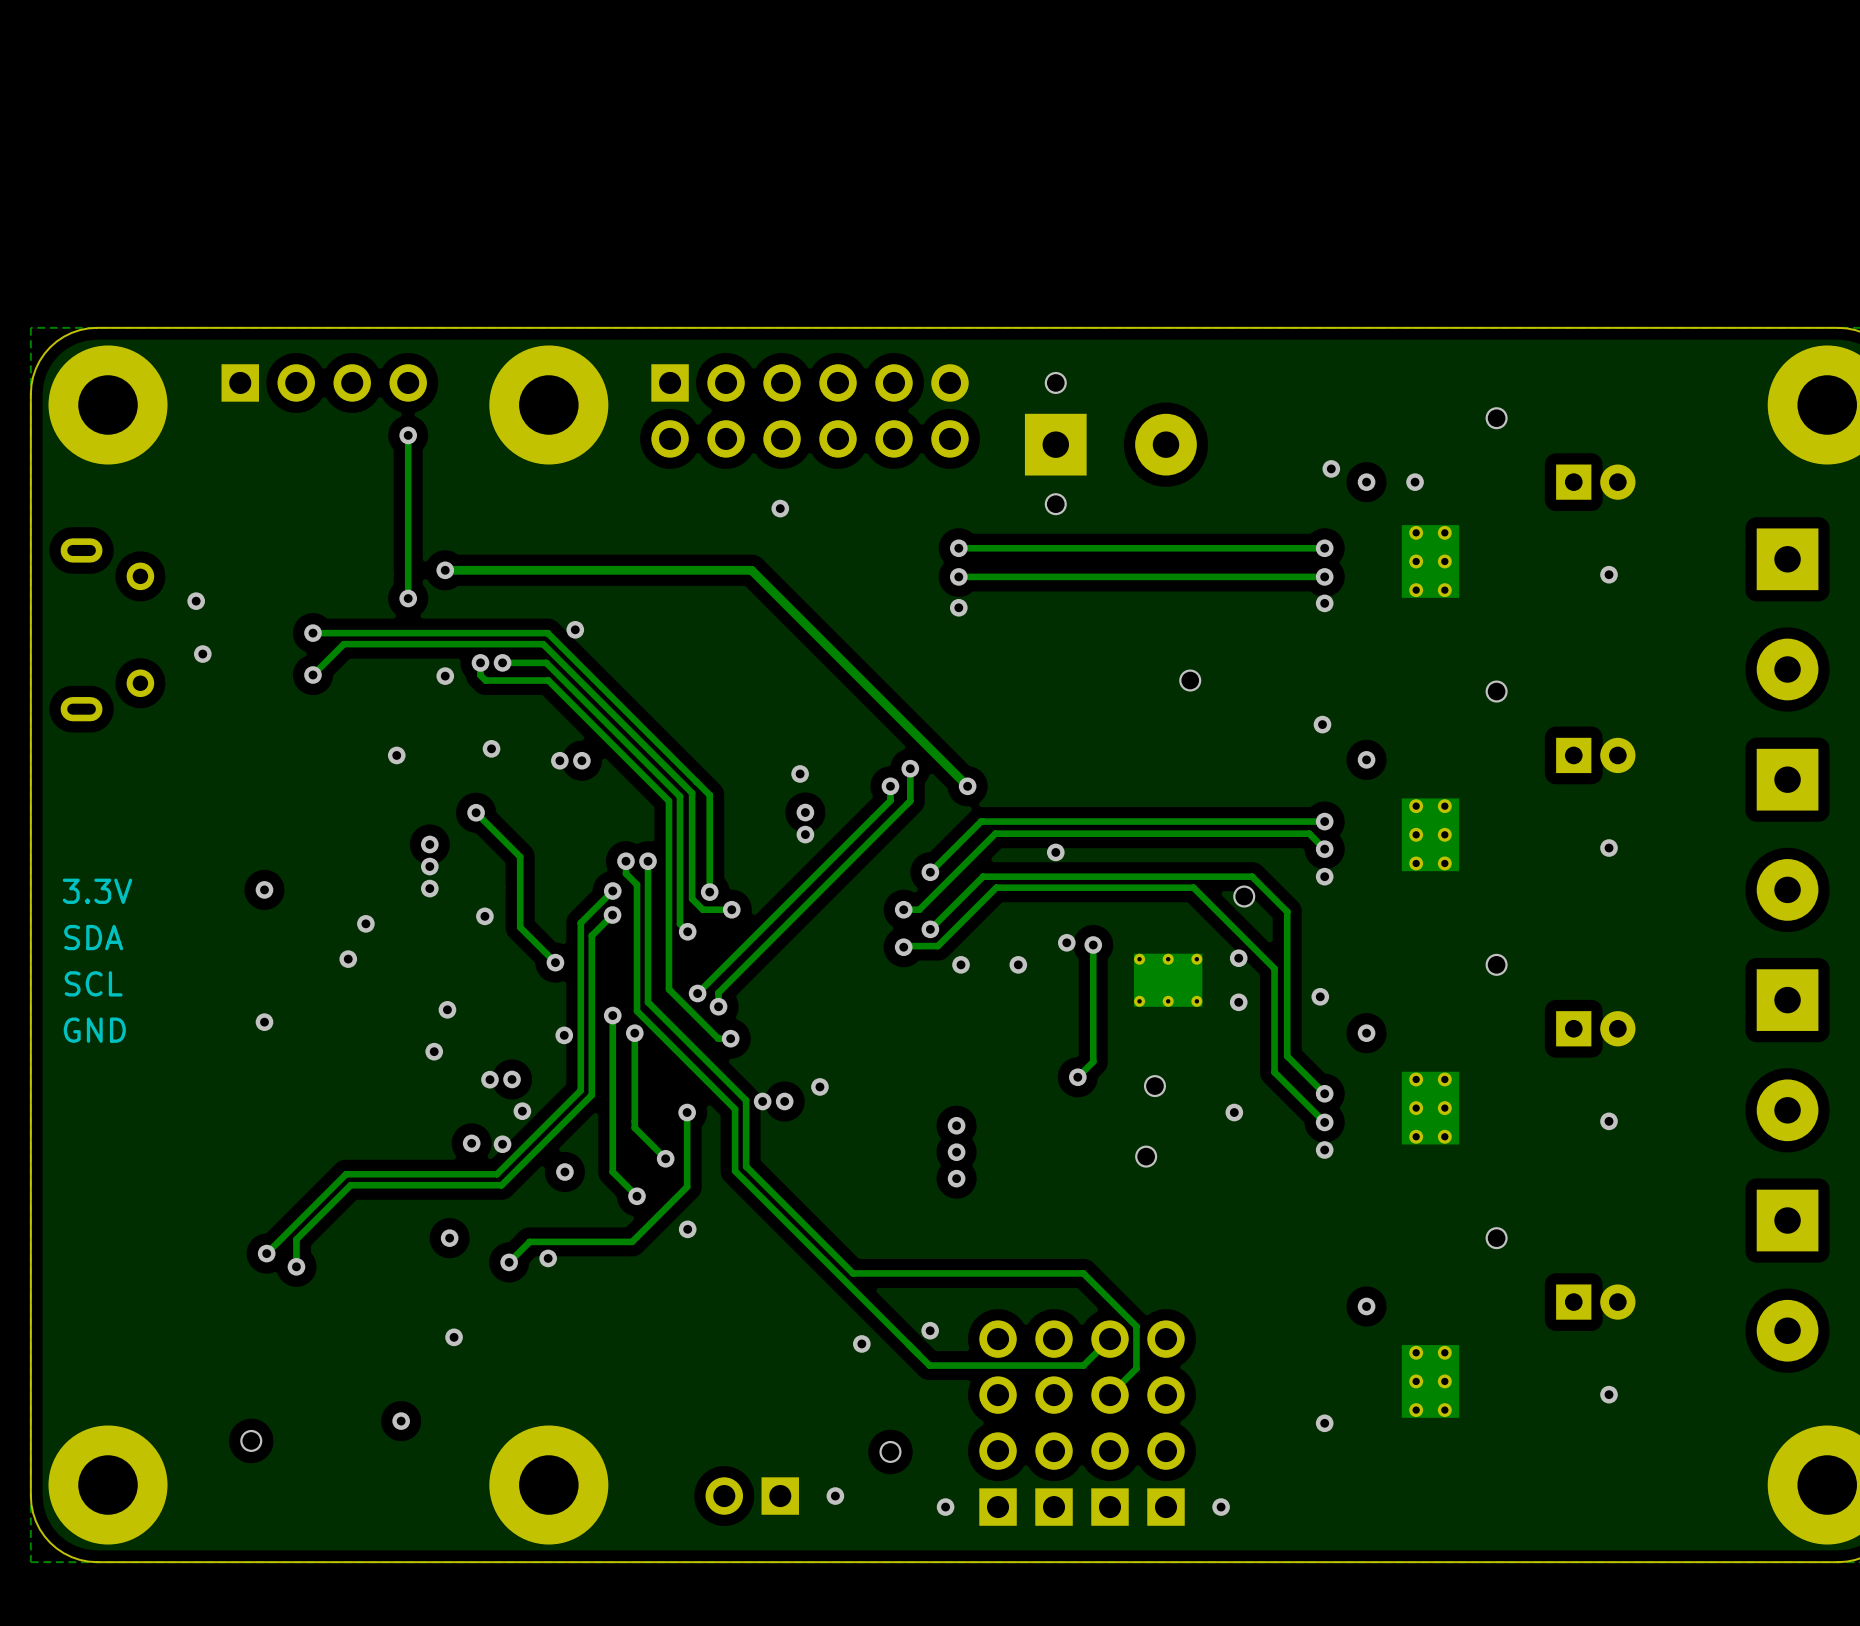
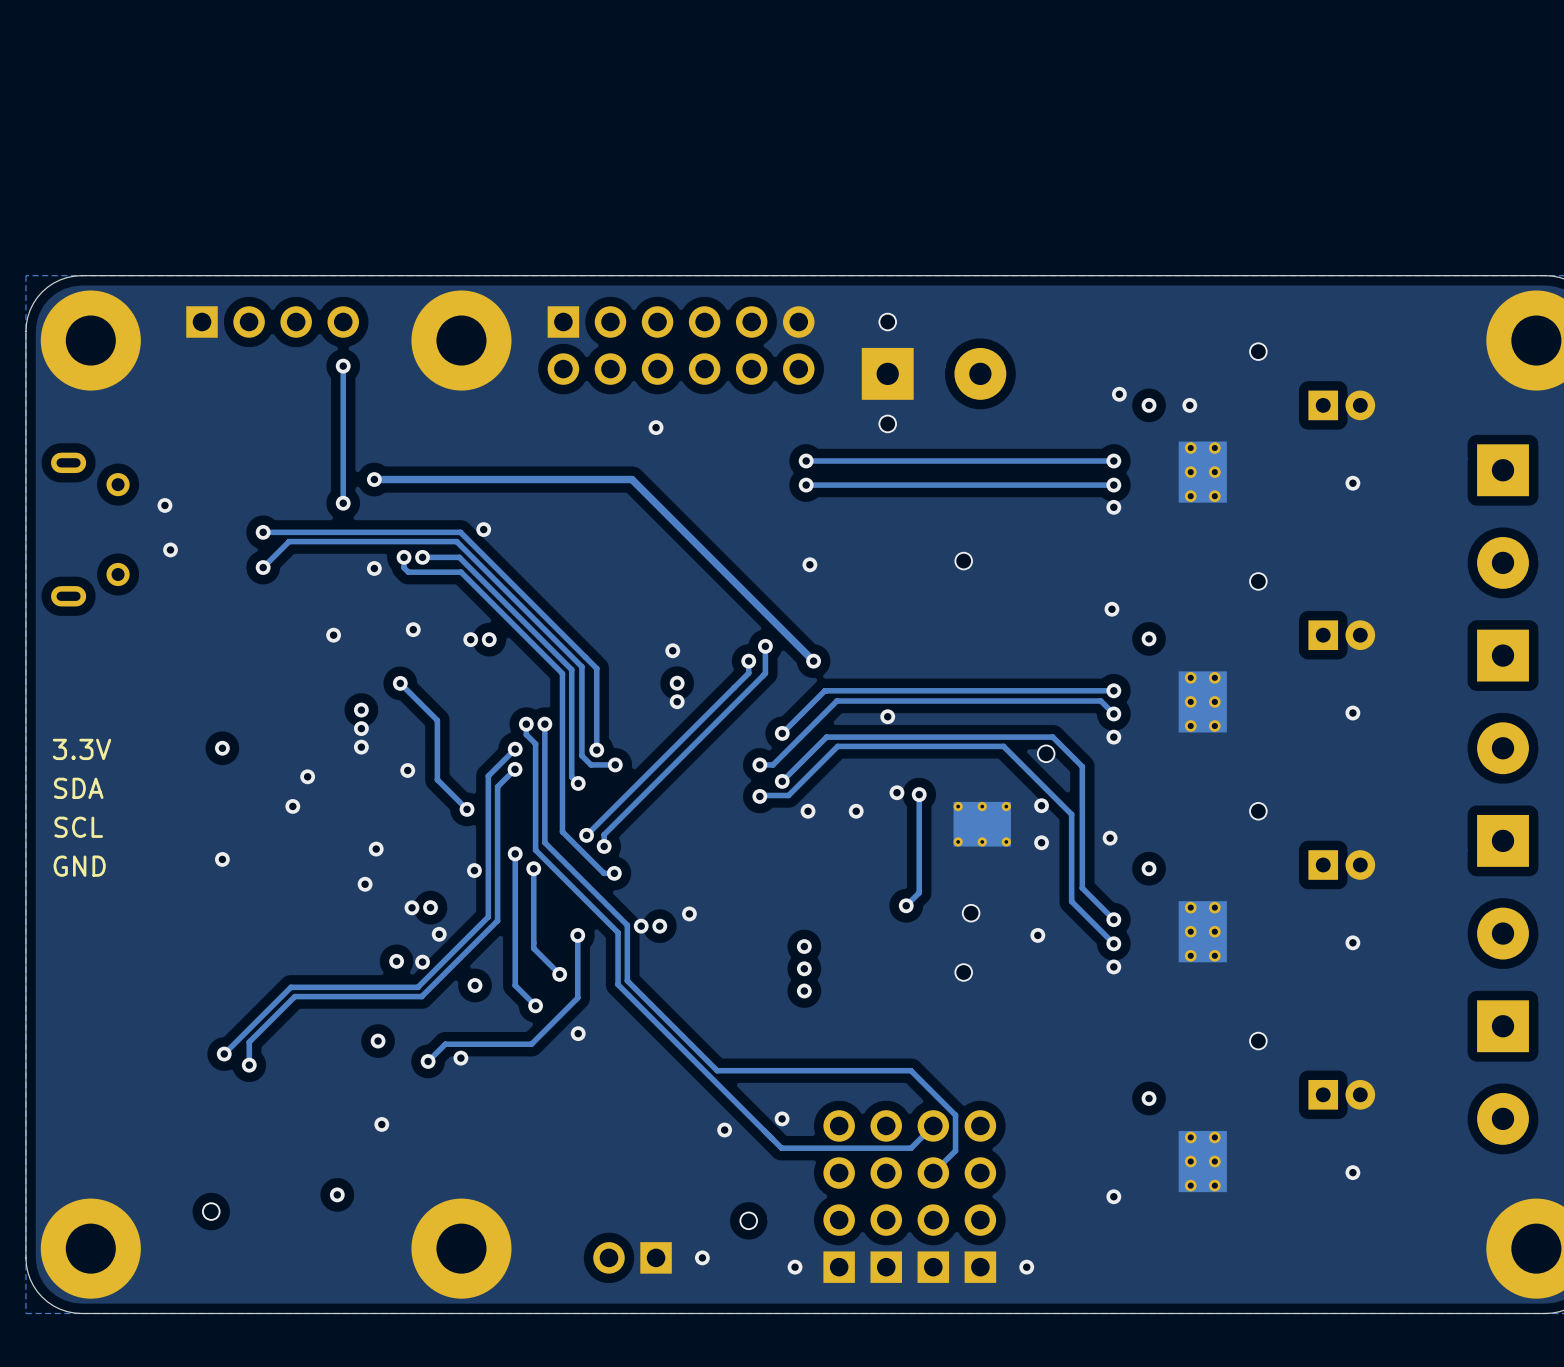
via position: (958, 607) -> (809, 564)
via position: (1190, 680) -> (963, 561)

